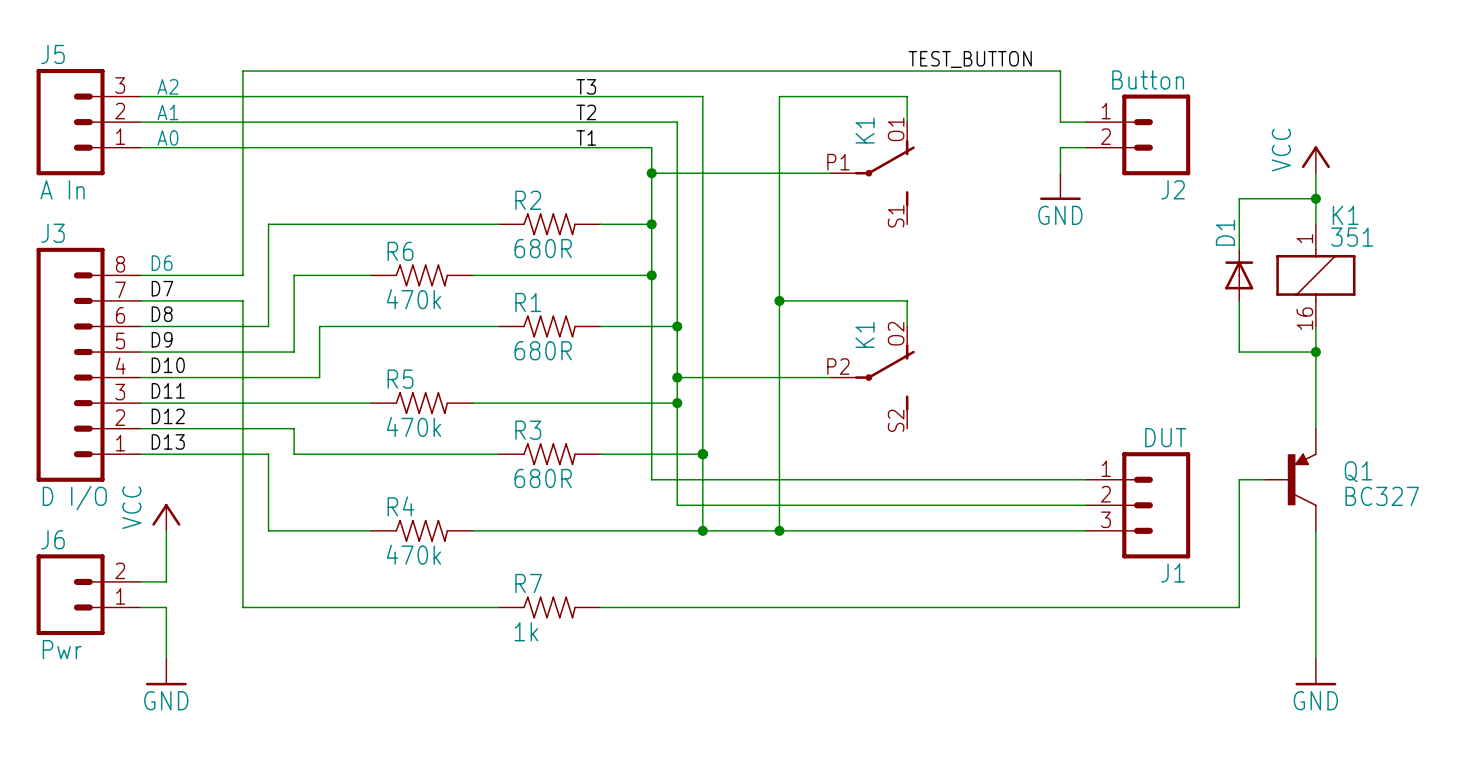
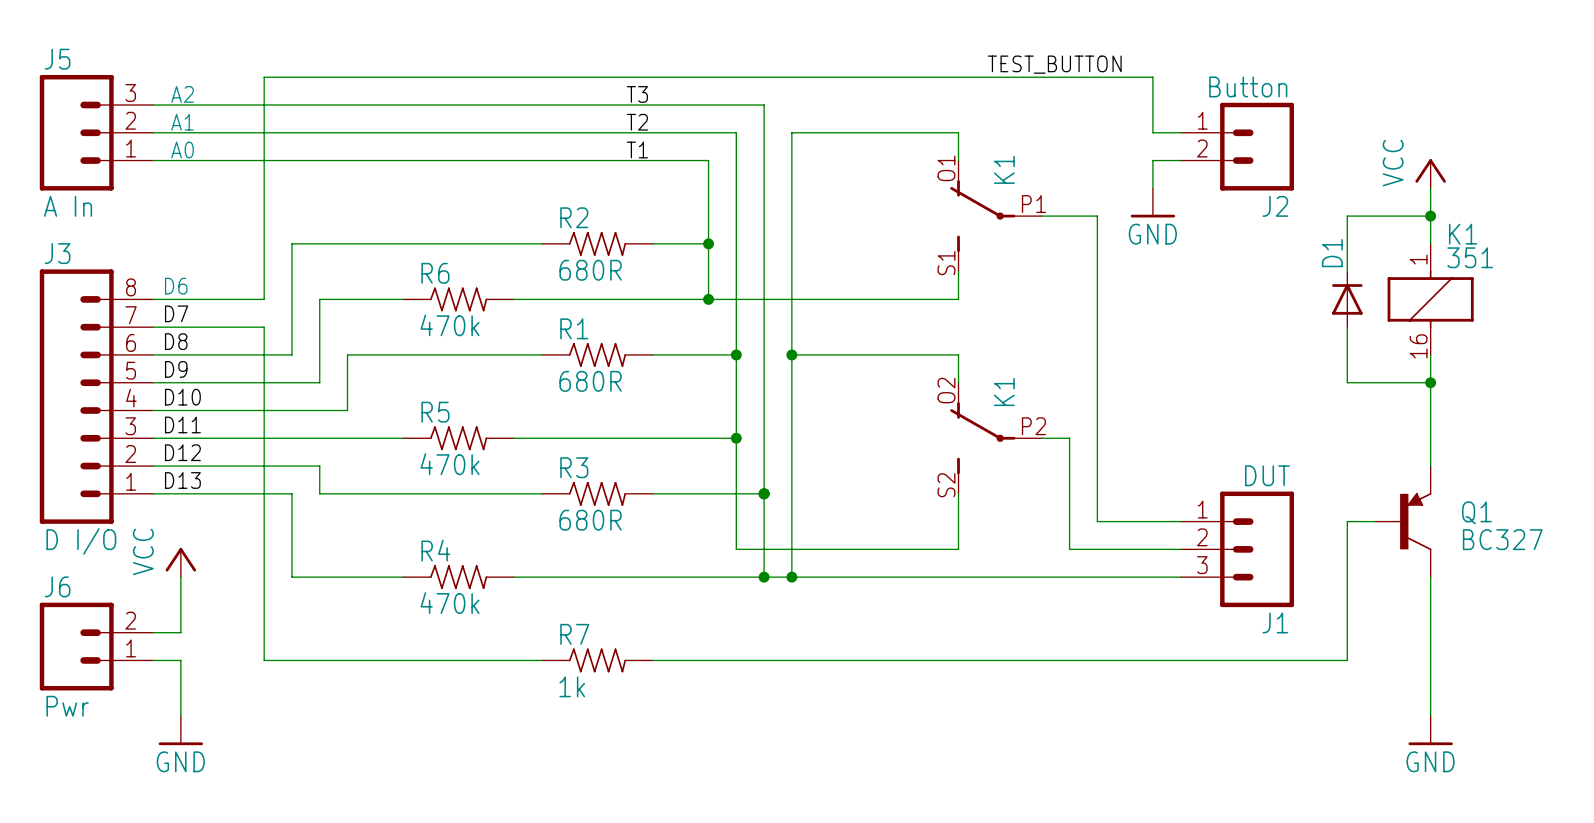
wire: (907, 122) (907, 96) (779, 96) (779, 530) -> none
wire: none -> (958, 160) (958, 132) (791, 132) (791, 577)
wire: (651, 173) (830, 173) -> none
junction: (651, 173) -> none
K1: (872, 173) -> none
K1: none -> (996, 216)
wire: none -> (1041, 216) (1097, 216) (1097, 521)
wire: (651, 275) (651, 479) (1009, 479) -> (708, 299) (958, 299) (958, 271)
wire: (779, 300) (907, 300) (907, 326) -> none
junction: (779, 300) -> none
wire: none -> (791, 354) (958, 354) (958, 382)
junction: none -> (791, 354)
wire: (677, 377) (830, 377) -> none
junction: (677, 377) -> none
K1: (872, 377) -> none
K1: none -> (996, 438)
wire: none -> (1041, 438) (1069, 438) (1069, 549)
wire: (881, 505) (983, 505) -> (958, 549) (958, 493)
junction position: (779, 530) -> (791, 577)

